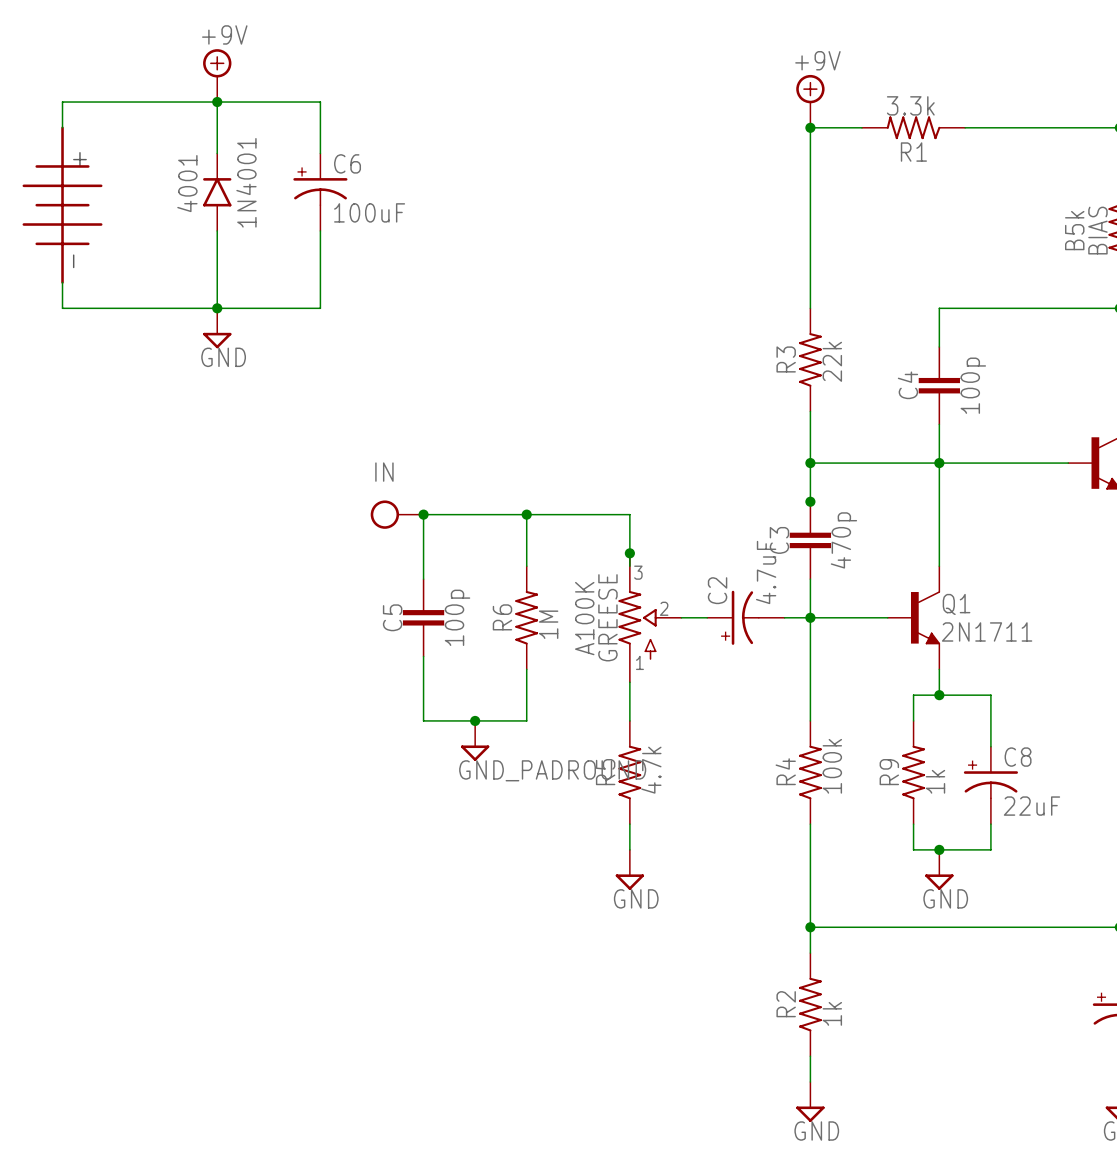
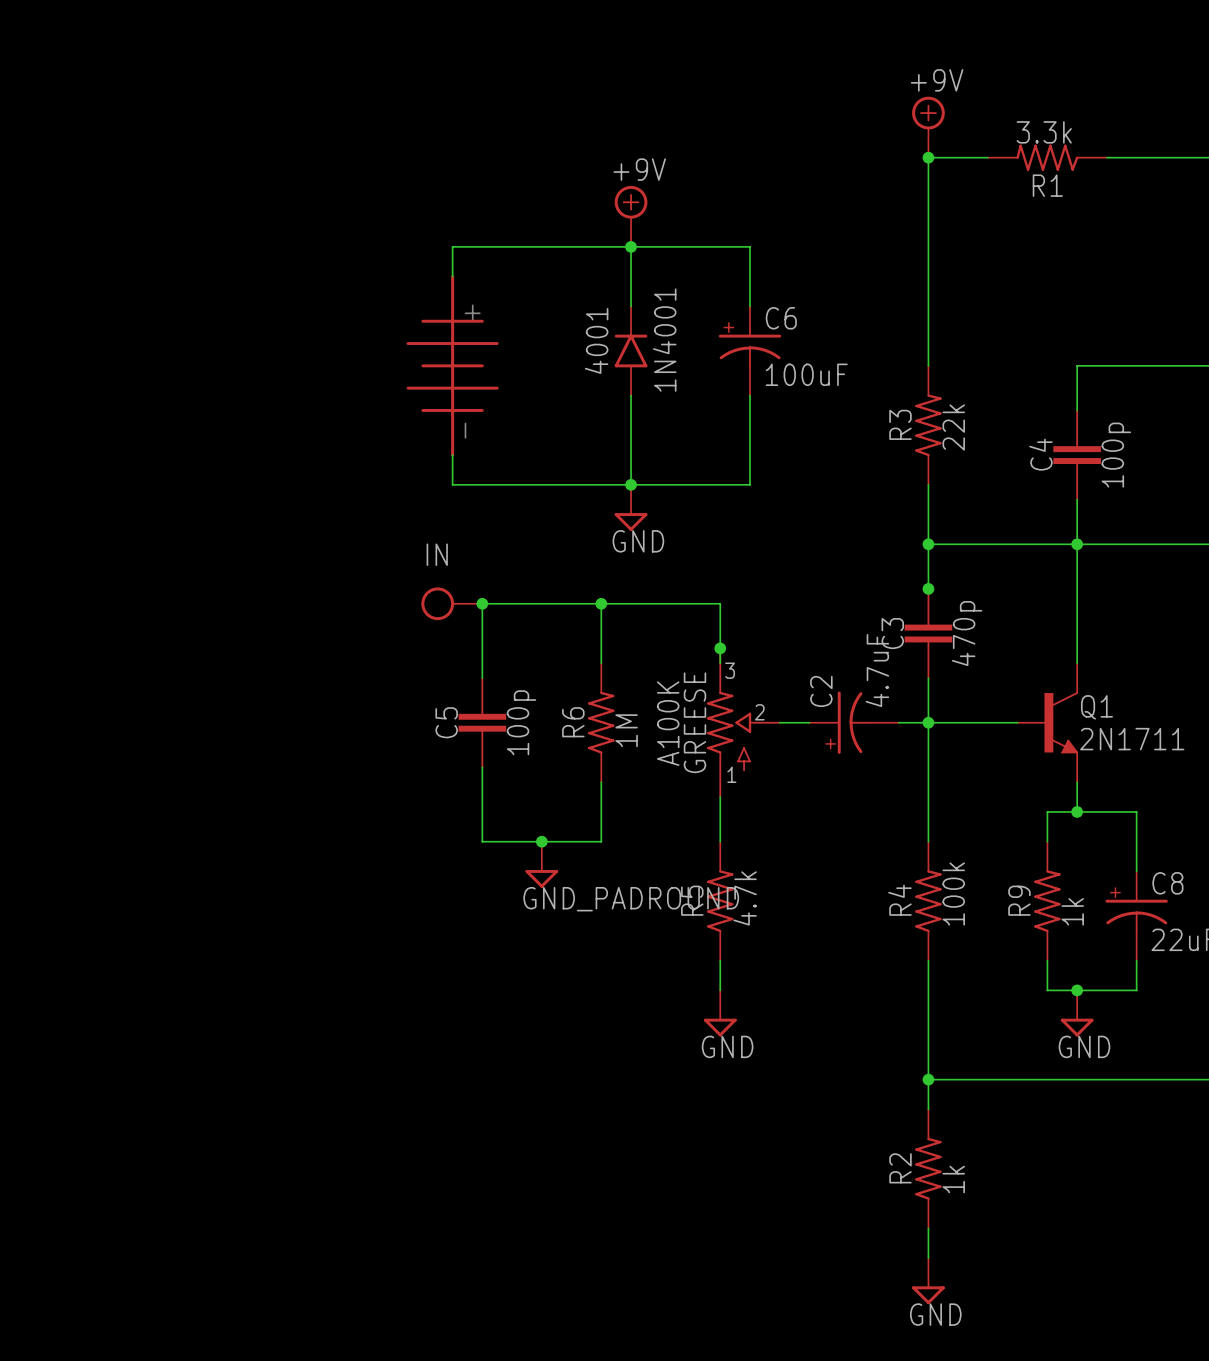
power symbol: +9V (217, 75) -> none
wire: (217, 102) (217, 153) -> none
junction: (217, 102) -> none
wire: (62, 127) (62, 102) (320, 102) (320, 153) -> none
power symbol: none -> +9V (631, 216)
4001 position: (217, 192) -> (631, 350)
C6 position: (320, 192) -> (750, 350)
part: (62, 205) -> none
wire: none -> (631, 246) (631, 306)
junction: none -> (631, 246)
wire: (217, 230) (217, 308) -> none
wire: (320, 230) (320, 308) (62, 308) (62, 282) -> none
wire: none -> (452, 276) (452, 246) (750, 246) (750, 306)
junction: (217, 308) -> none
part: none -> (452, 365)
power symbol: GND (217, 328) -> none
wire: none -> (631, 395) (631, 484)
wire: none -> (750, 395) (750, 484) (452, 484) (452, 455)
junction: none -> (631, 484)
power symbol: none -> GND (631, 507)

